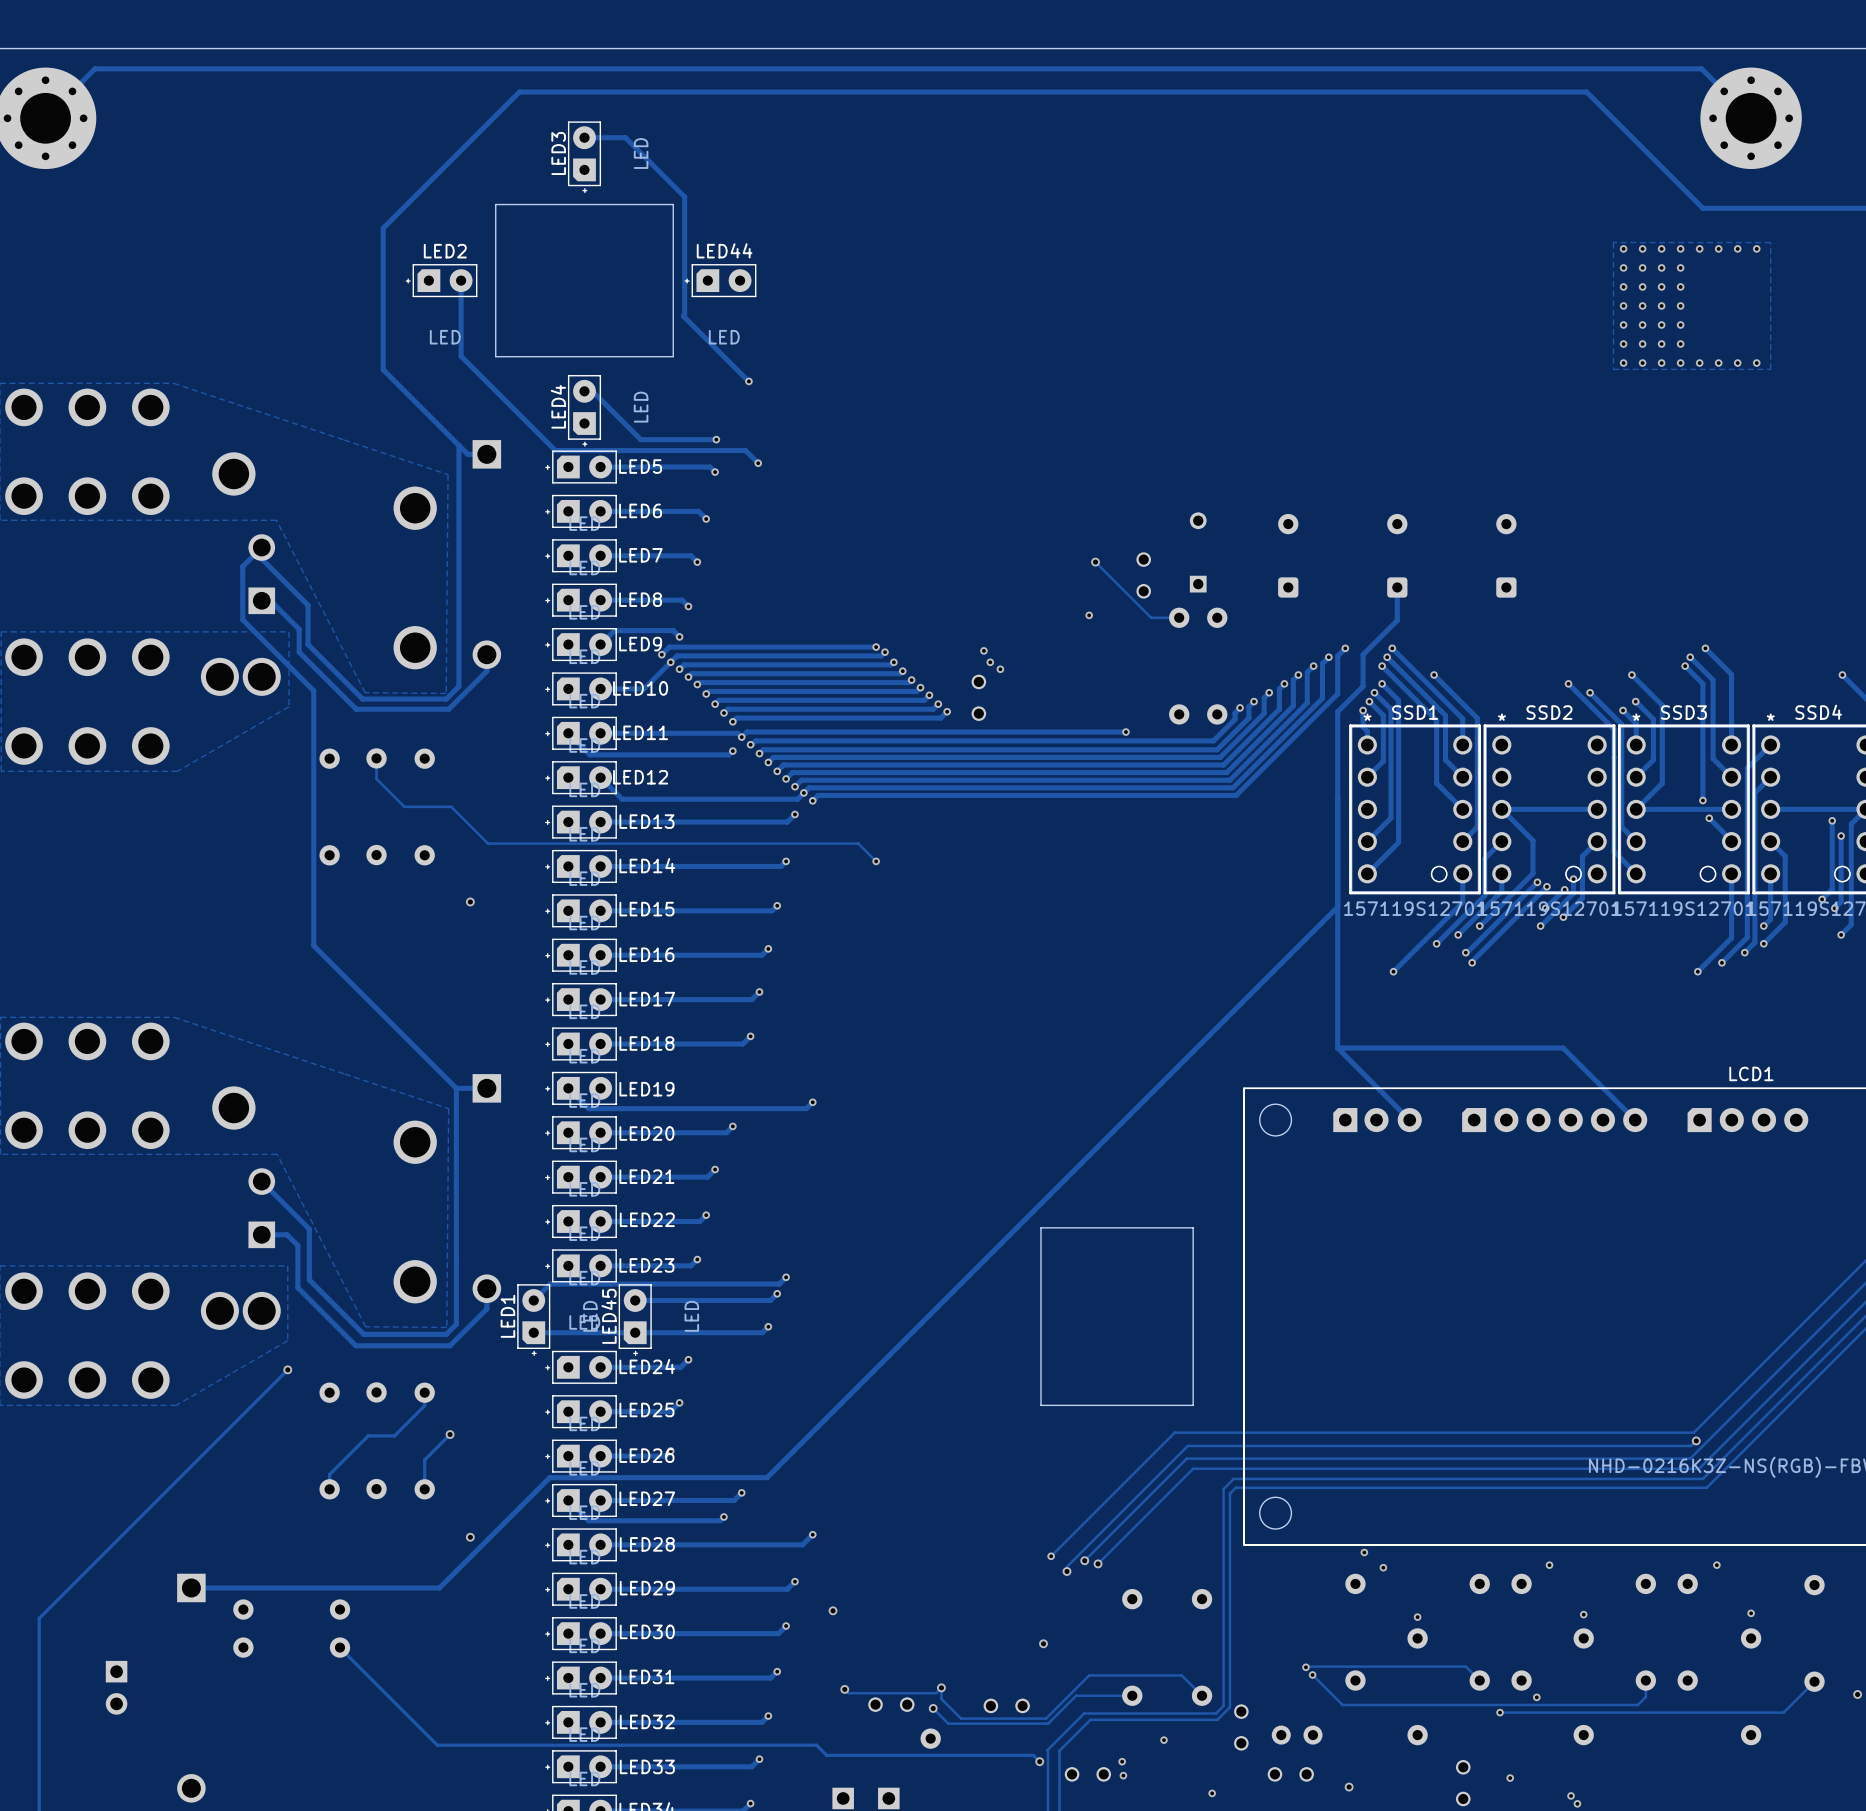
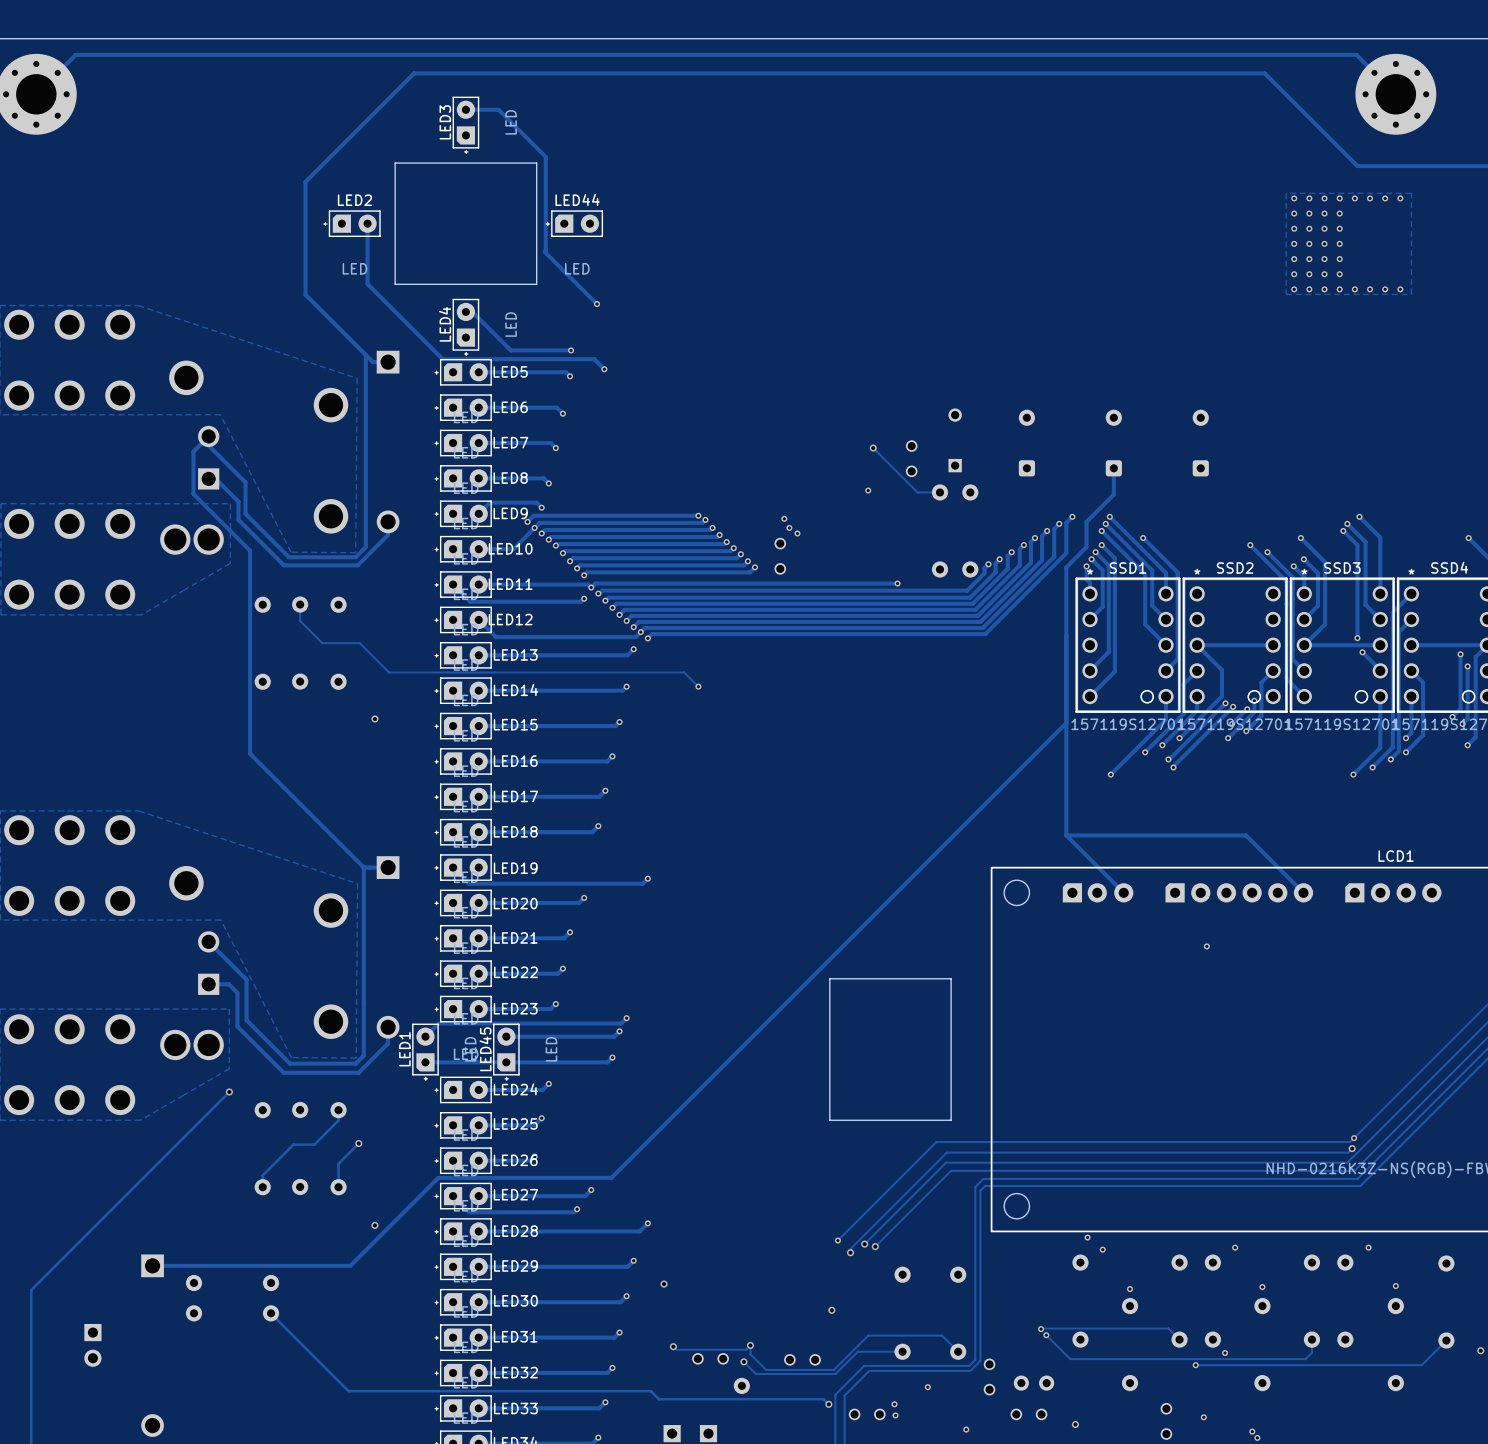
via: none -> (1206, 946)
via: none -> (1354, 1138)

